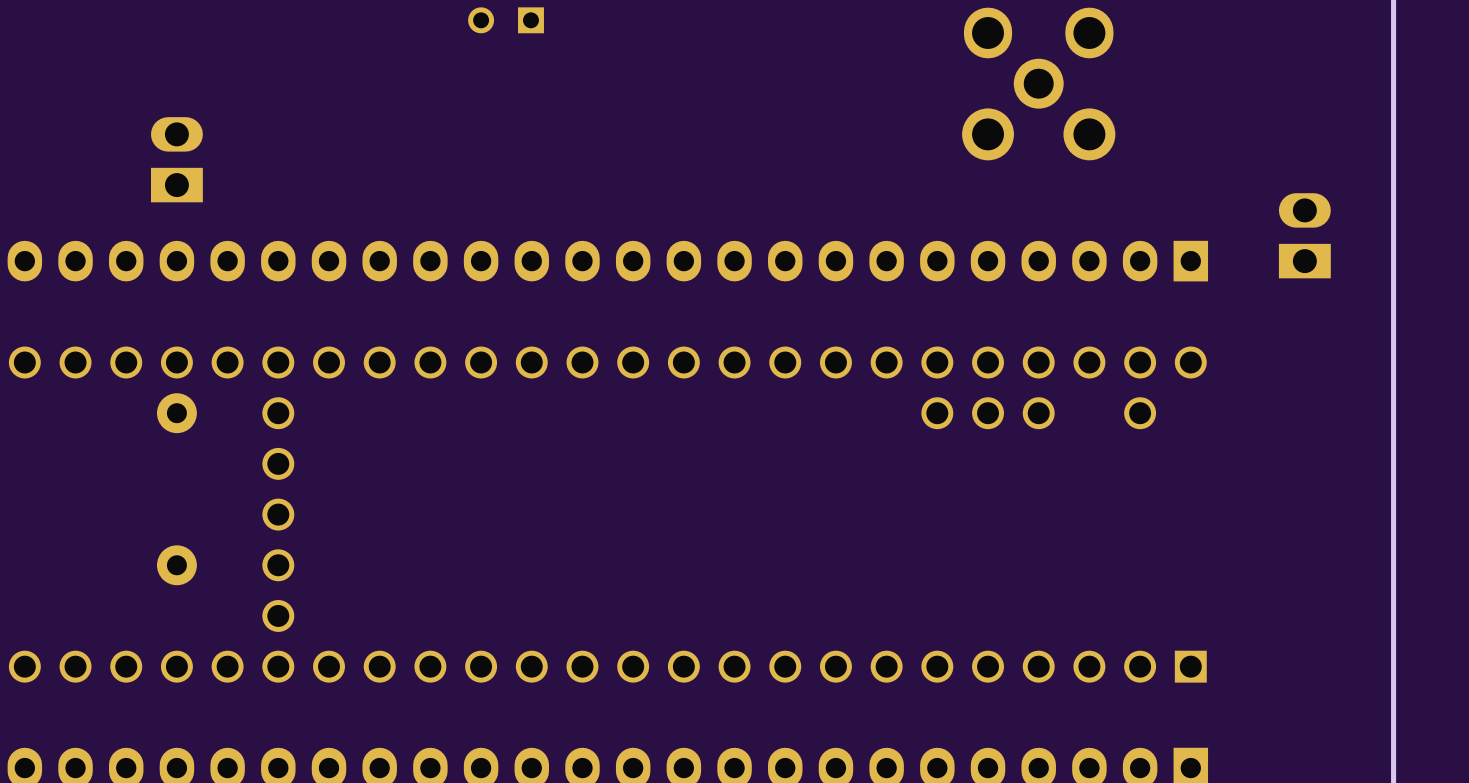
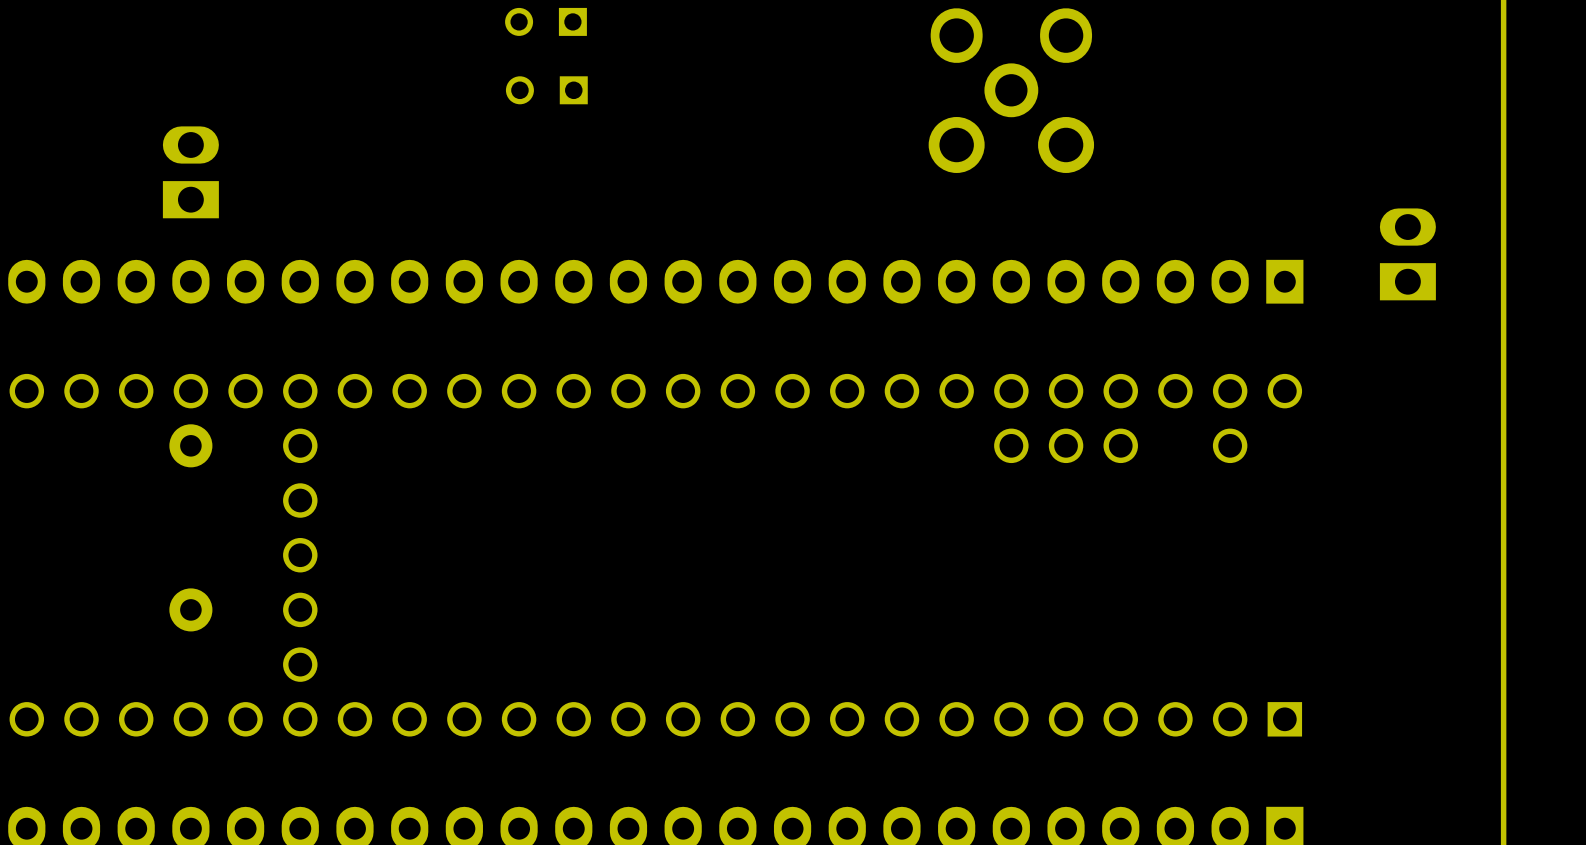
part: none -> (546, 90)
part position: (1038, 83) -> (1011, 90)

